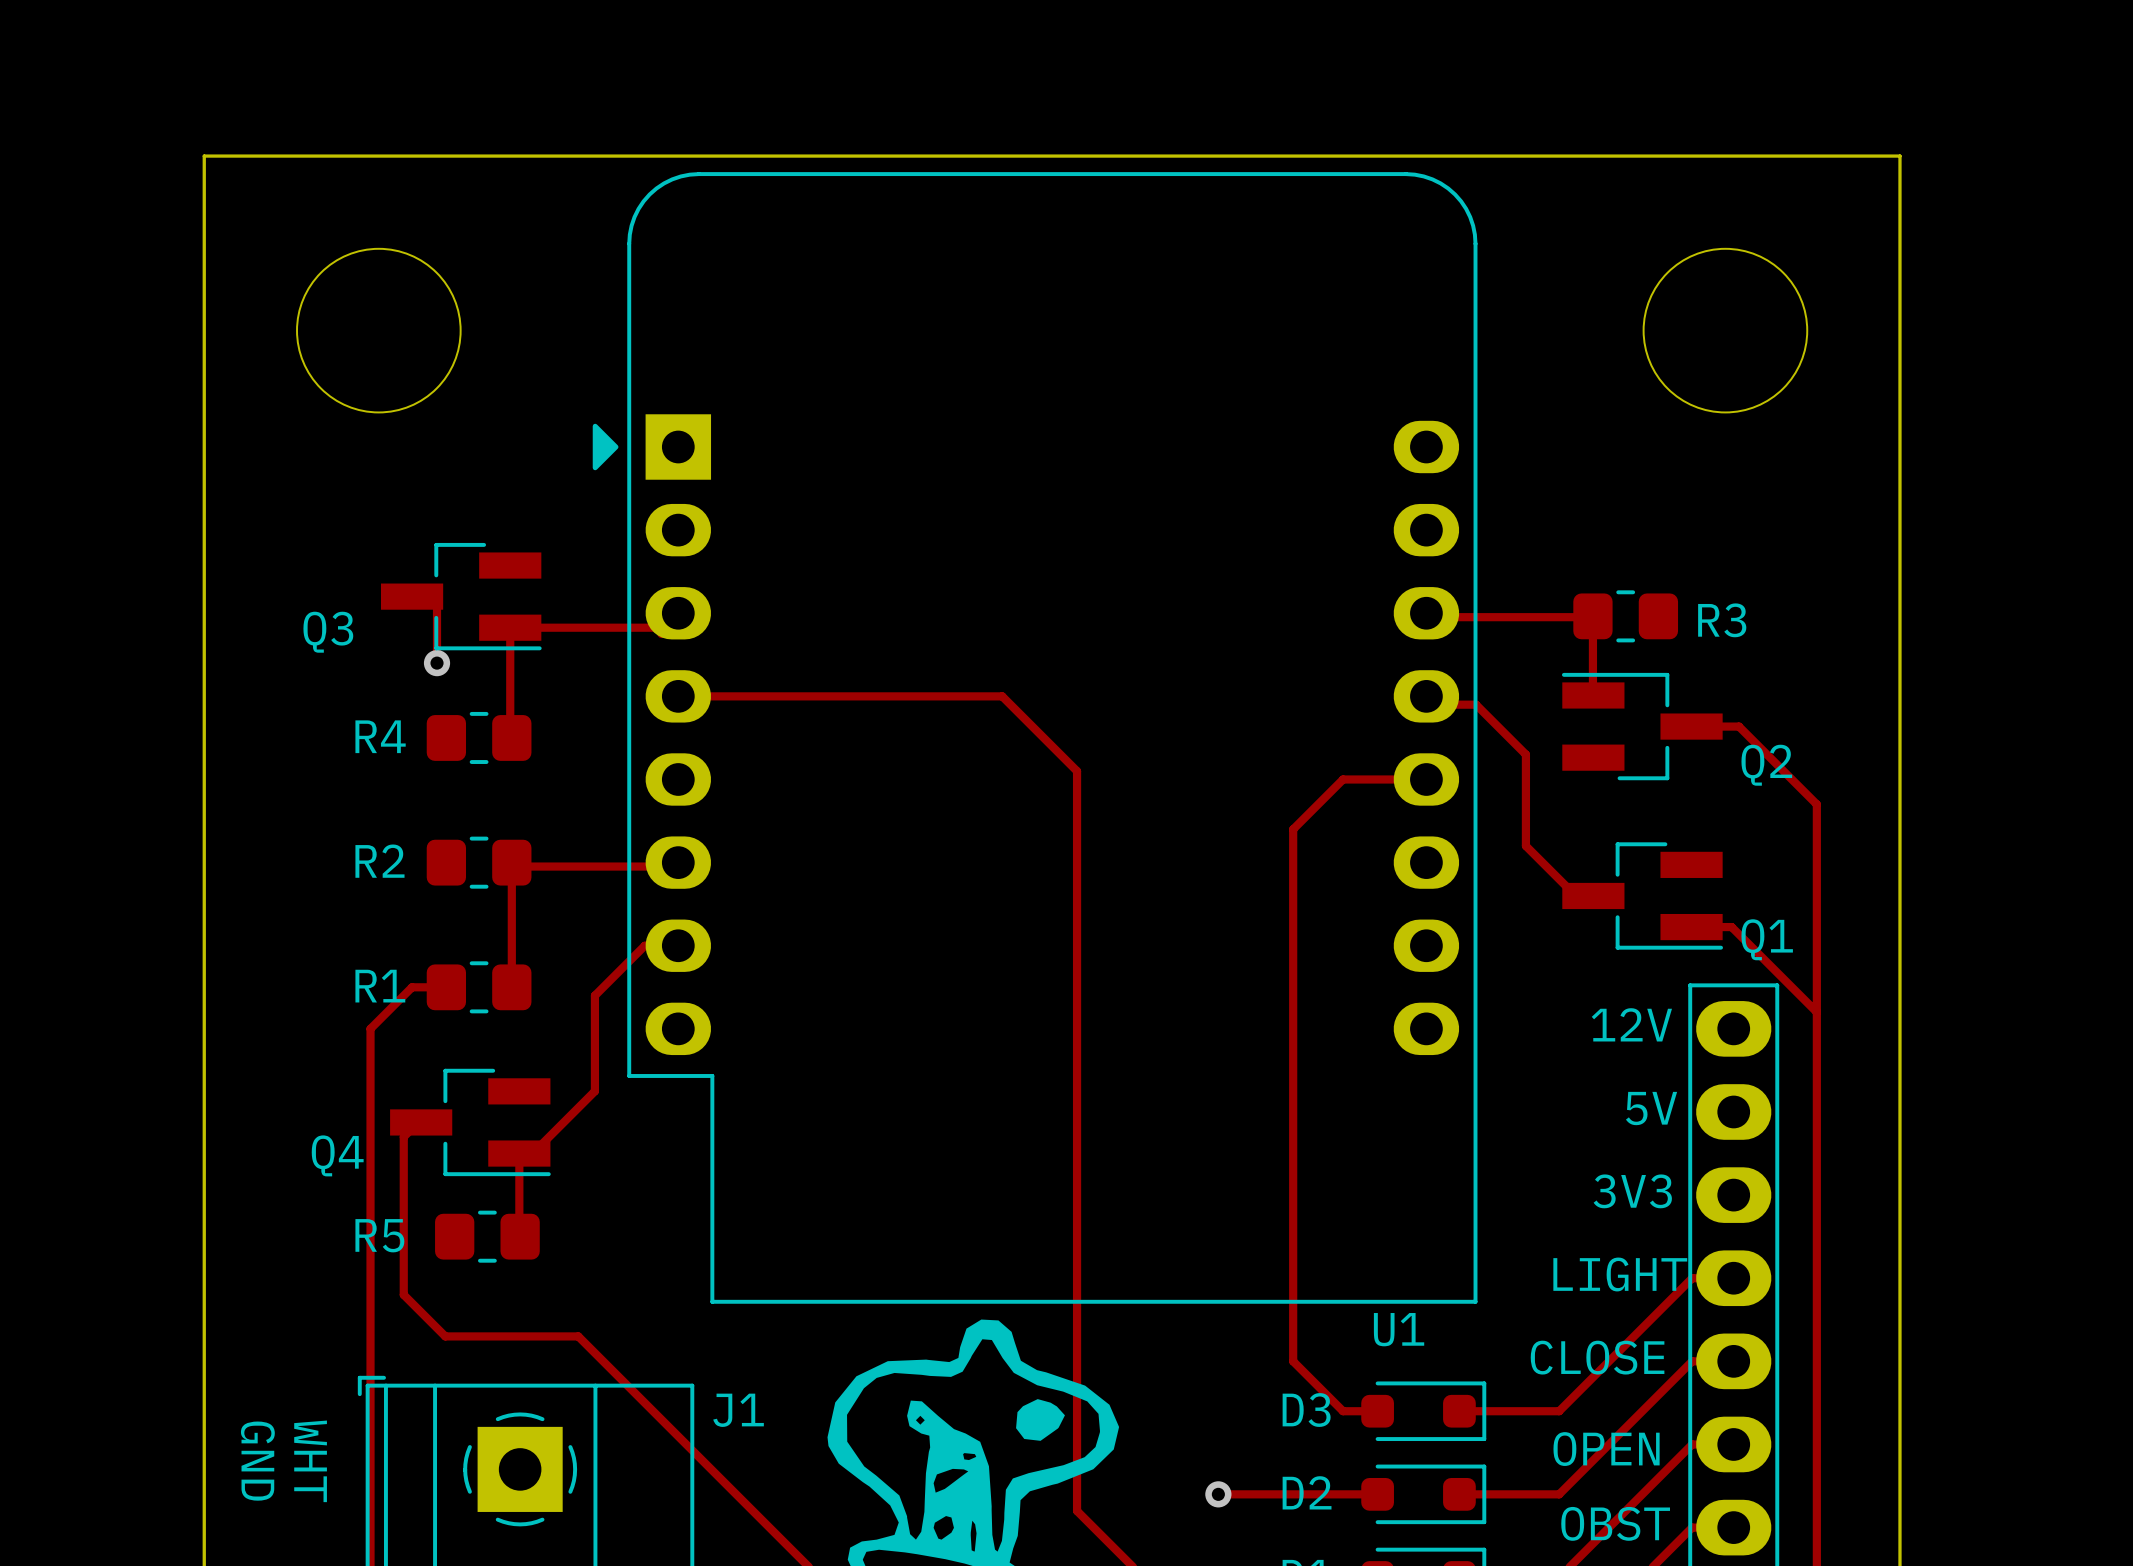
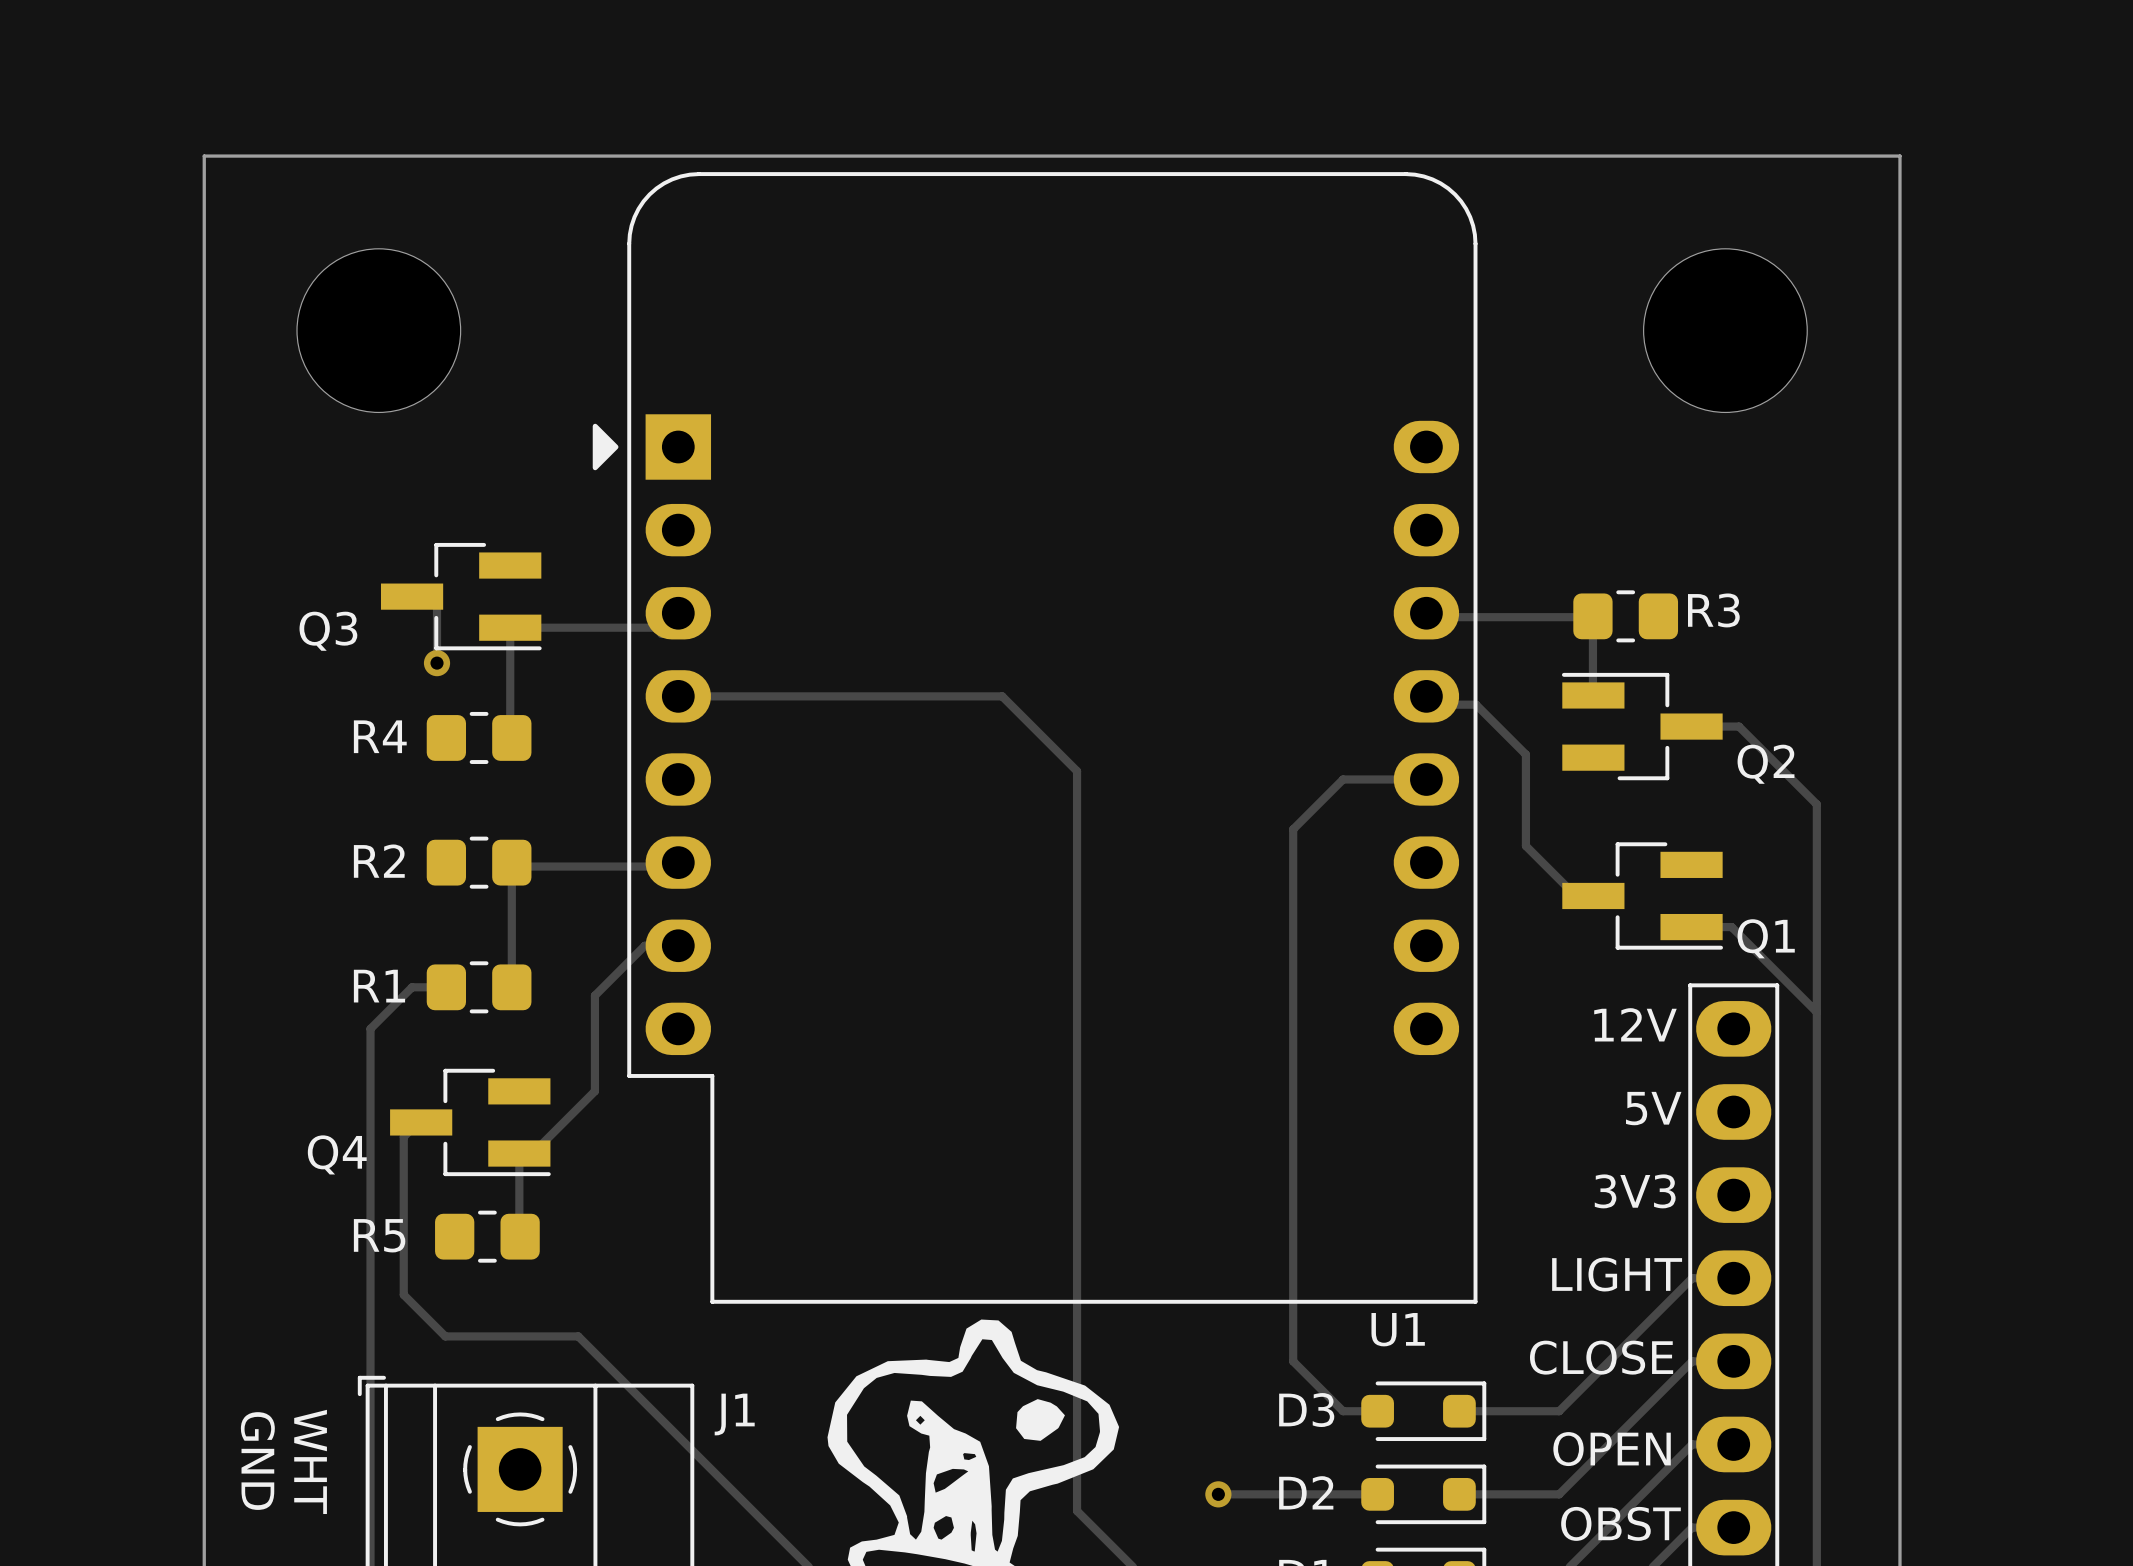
R3 name position: R3 (1722, 620) -> R3 (1713, 610)

